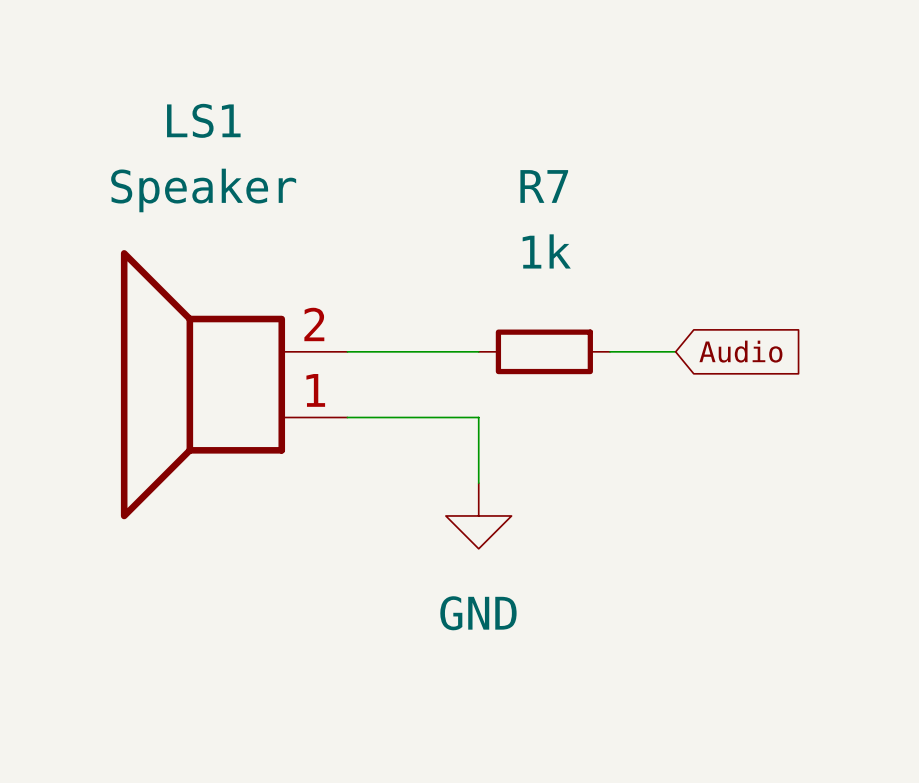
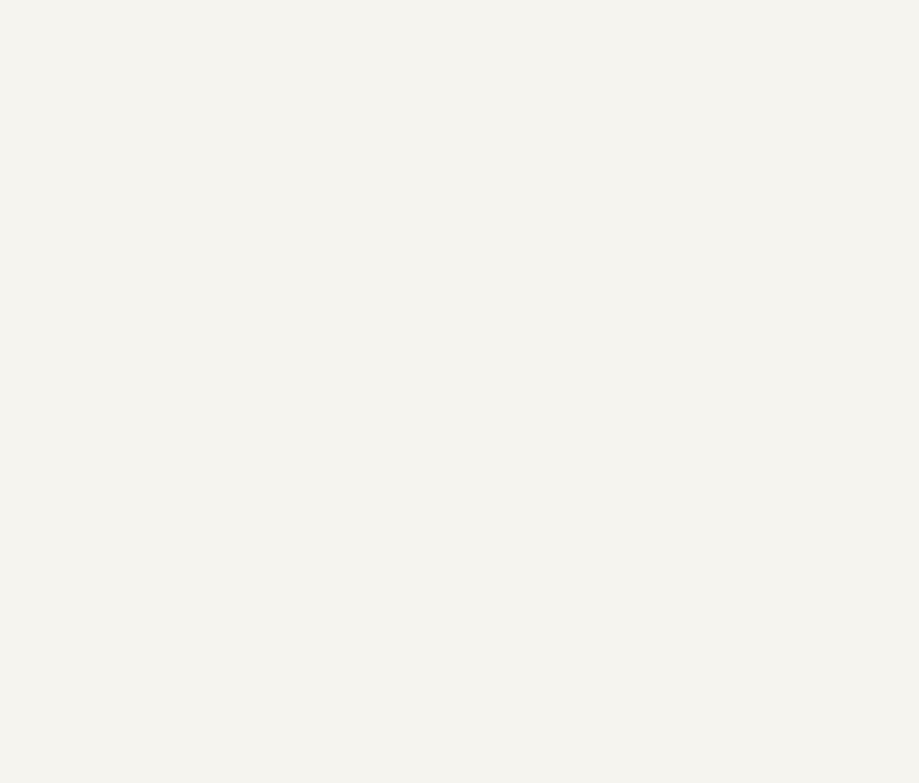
wire: (347, 351) (478, 351) -> none
R7: 1k (544, 351) -> none
wire: (610, 351) (675, 351) -> none
global label: Audio (740, 351) -> none
LS1: Speaker (234, 384) -> none
wire: (347, 417) (478, 417) (478, 483) -> none
power symbol: GND (478, 515) -> none

